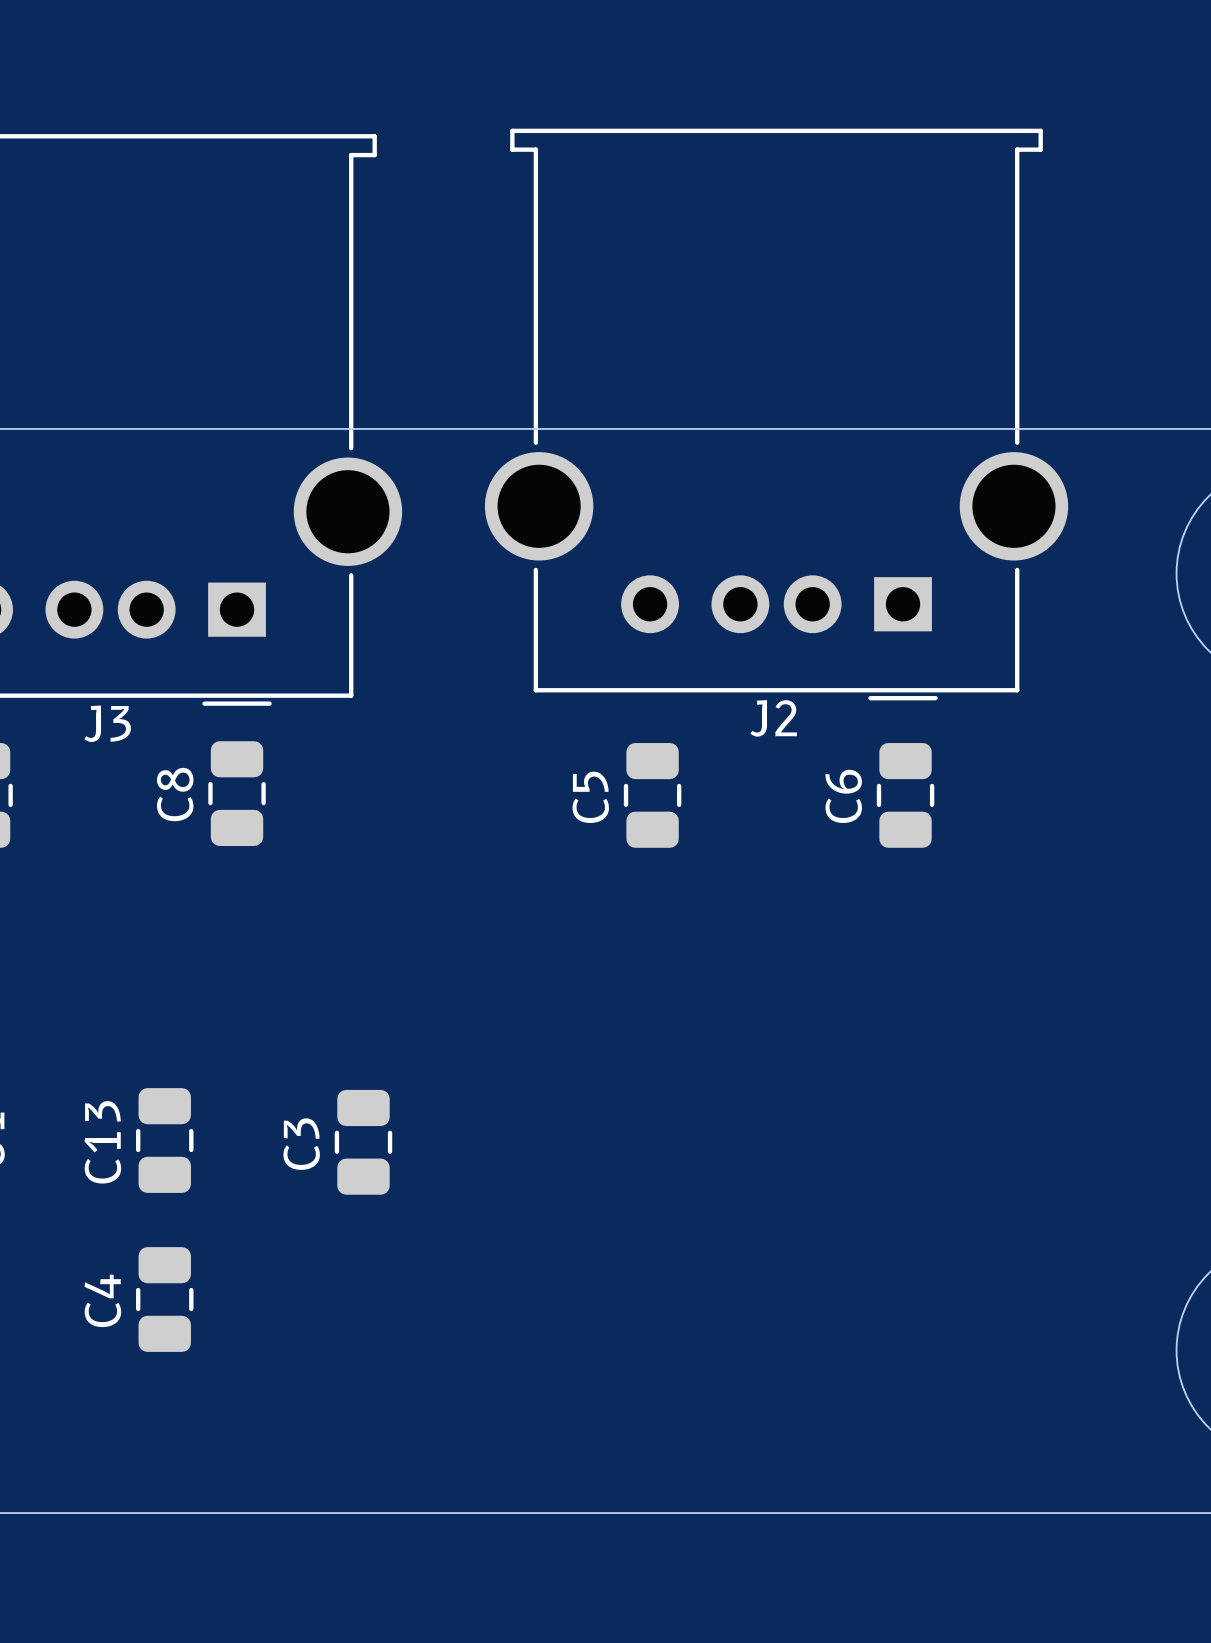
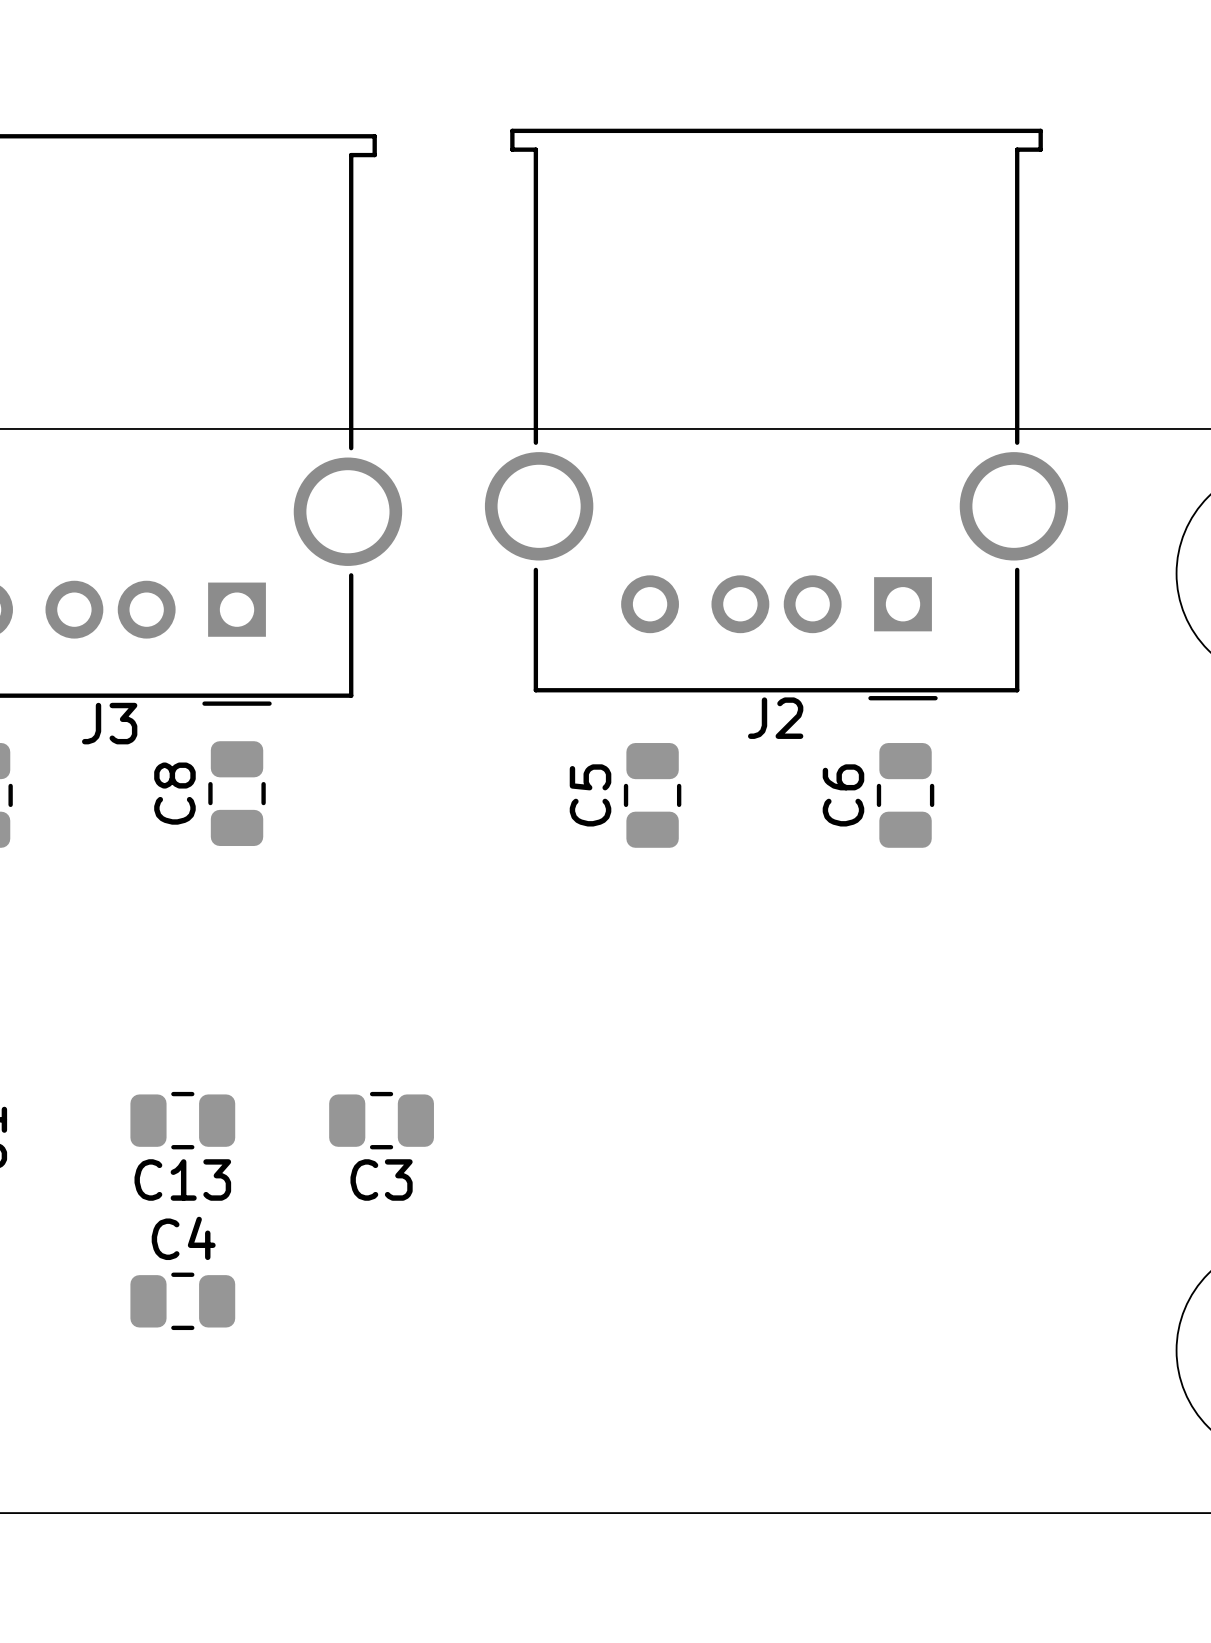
C13 rotation: 0° (164, 1140) -> 90° clockwise (182, 1120)
C13 name position: C13 (102, 1142) -> C13 (182, 1179)
C3 rotation: 0° (363, 1142) -> 90° clockwise (381, 1120)
C3 name position: C3 (301, 1144) -> C3 (381, 1179)
C4 rotation: 0° (164, 1299) -> 90° clockwise (182, 1301)

